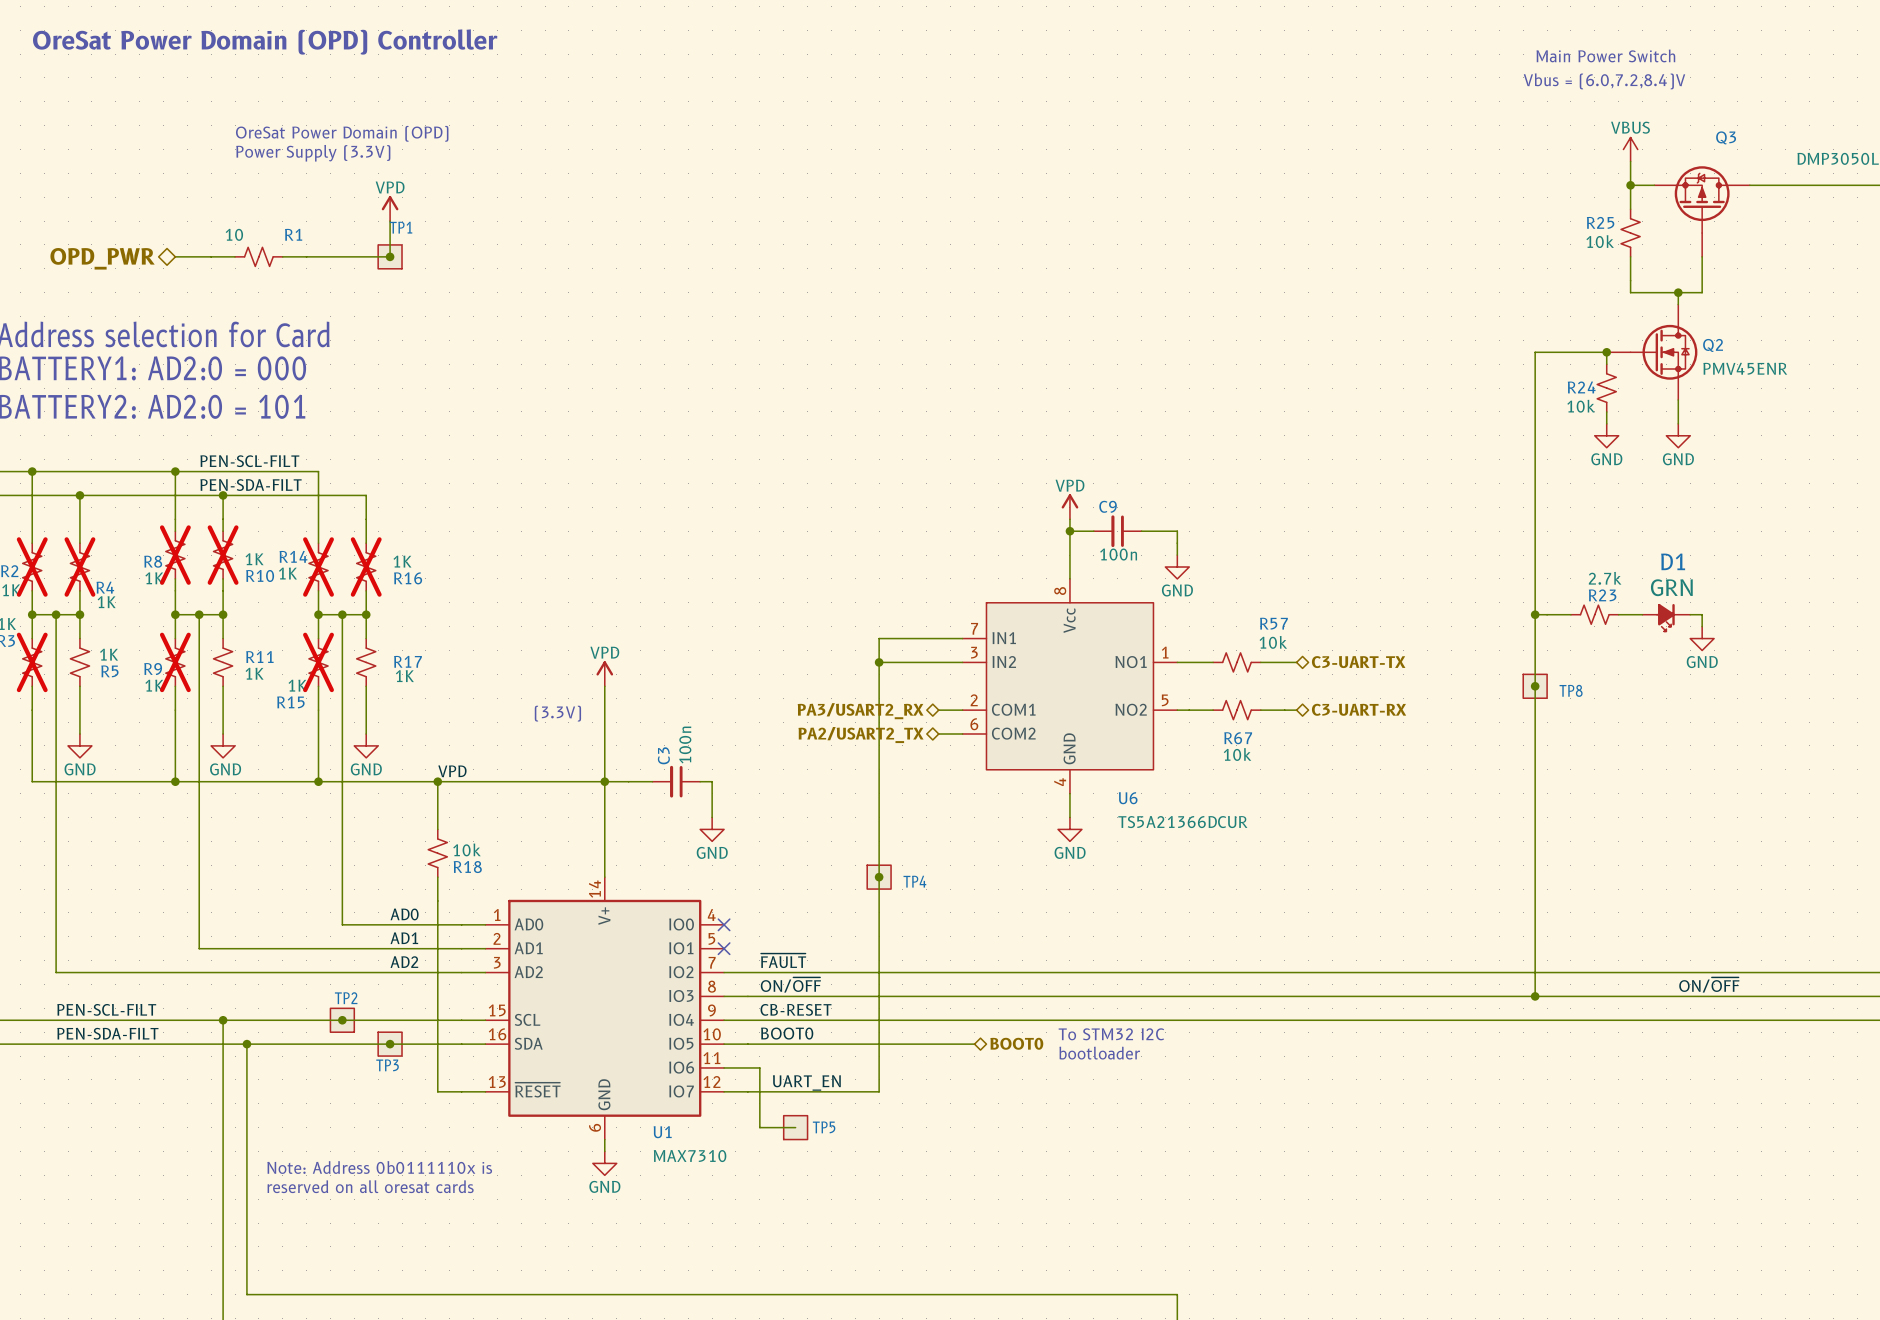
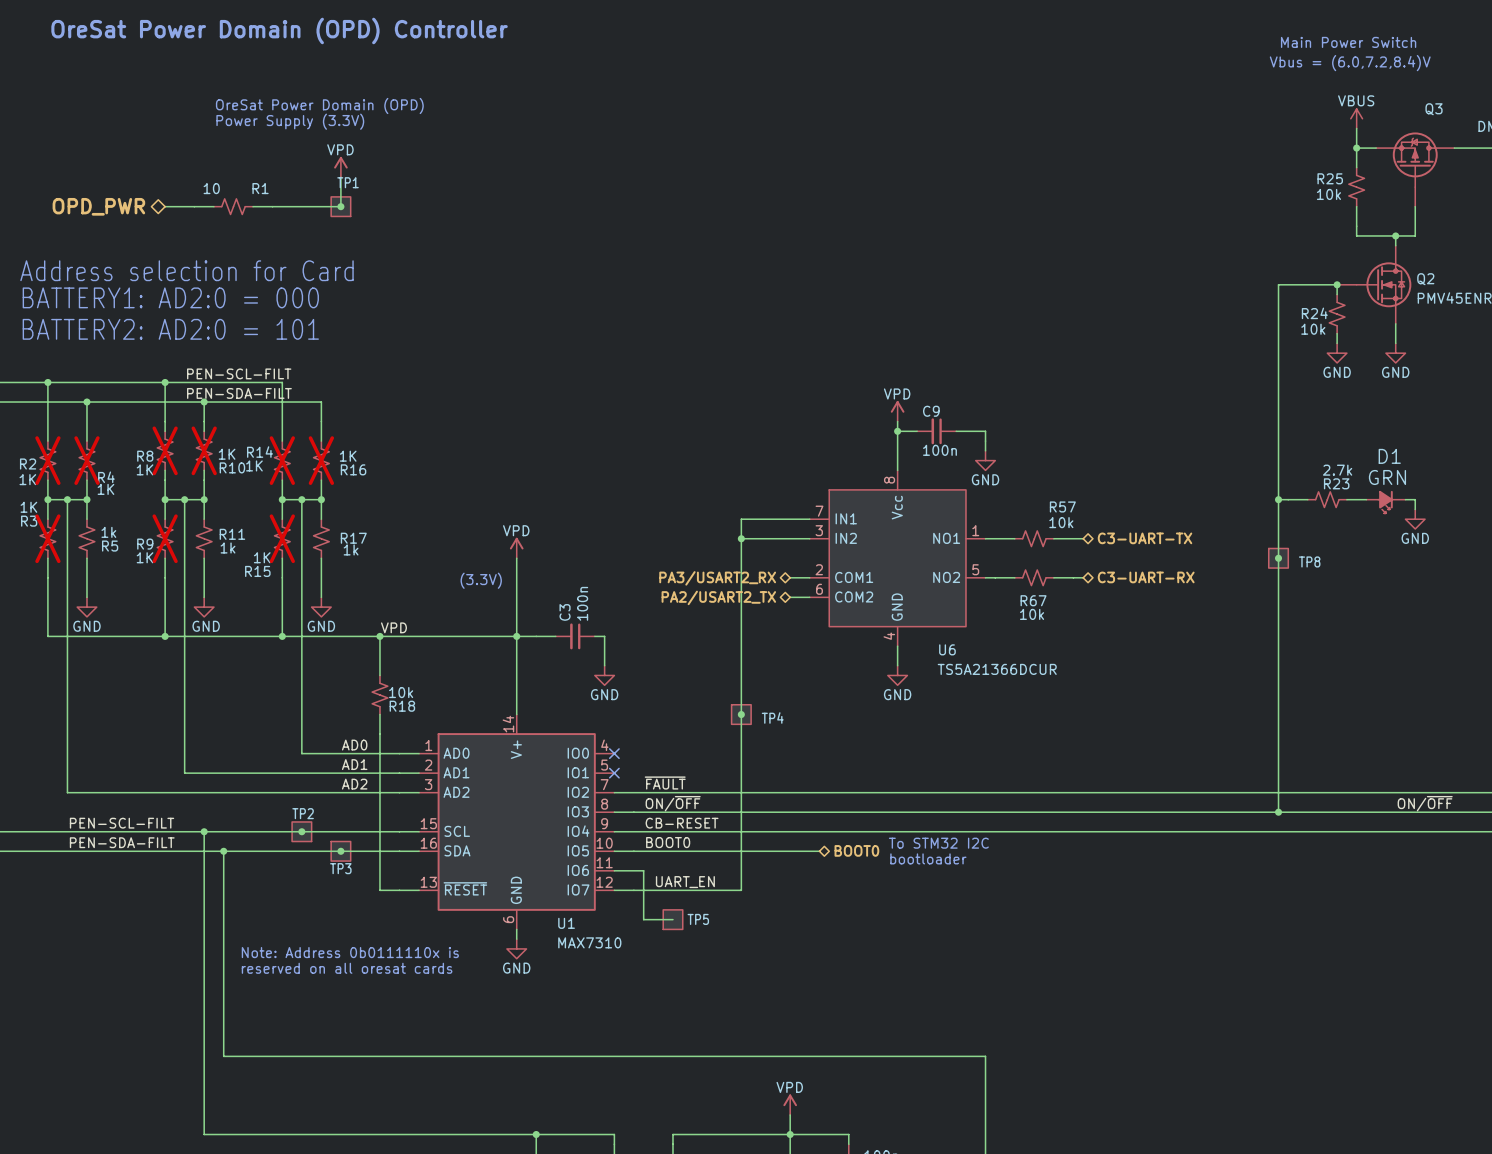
R5 value: 1K (109, 654) -> 1k (108, 532)
R11 value: 1K (254, 673) -> 1k (228, 548)
R17 value: 1K (404, 676) -> 1k (351, 549)

